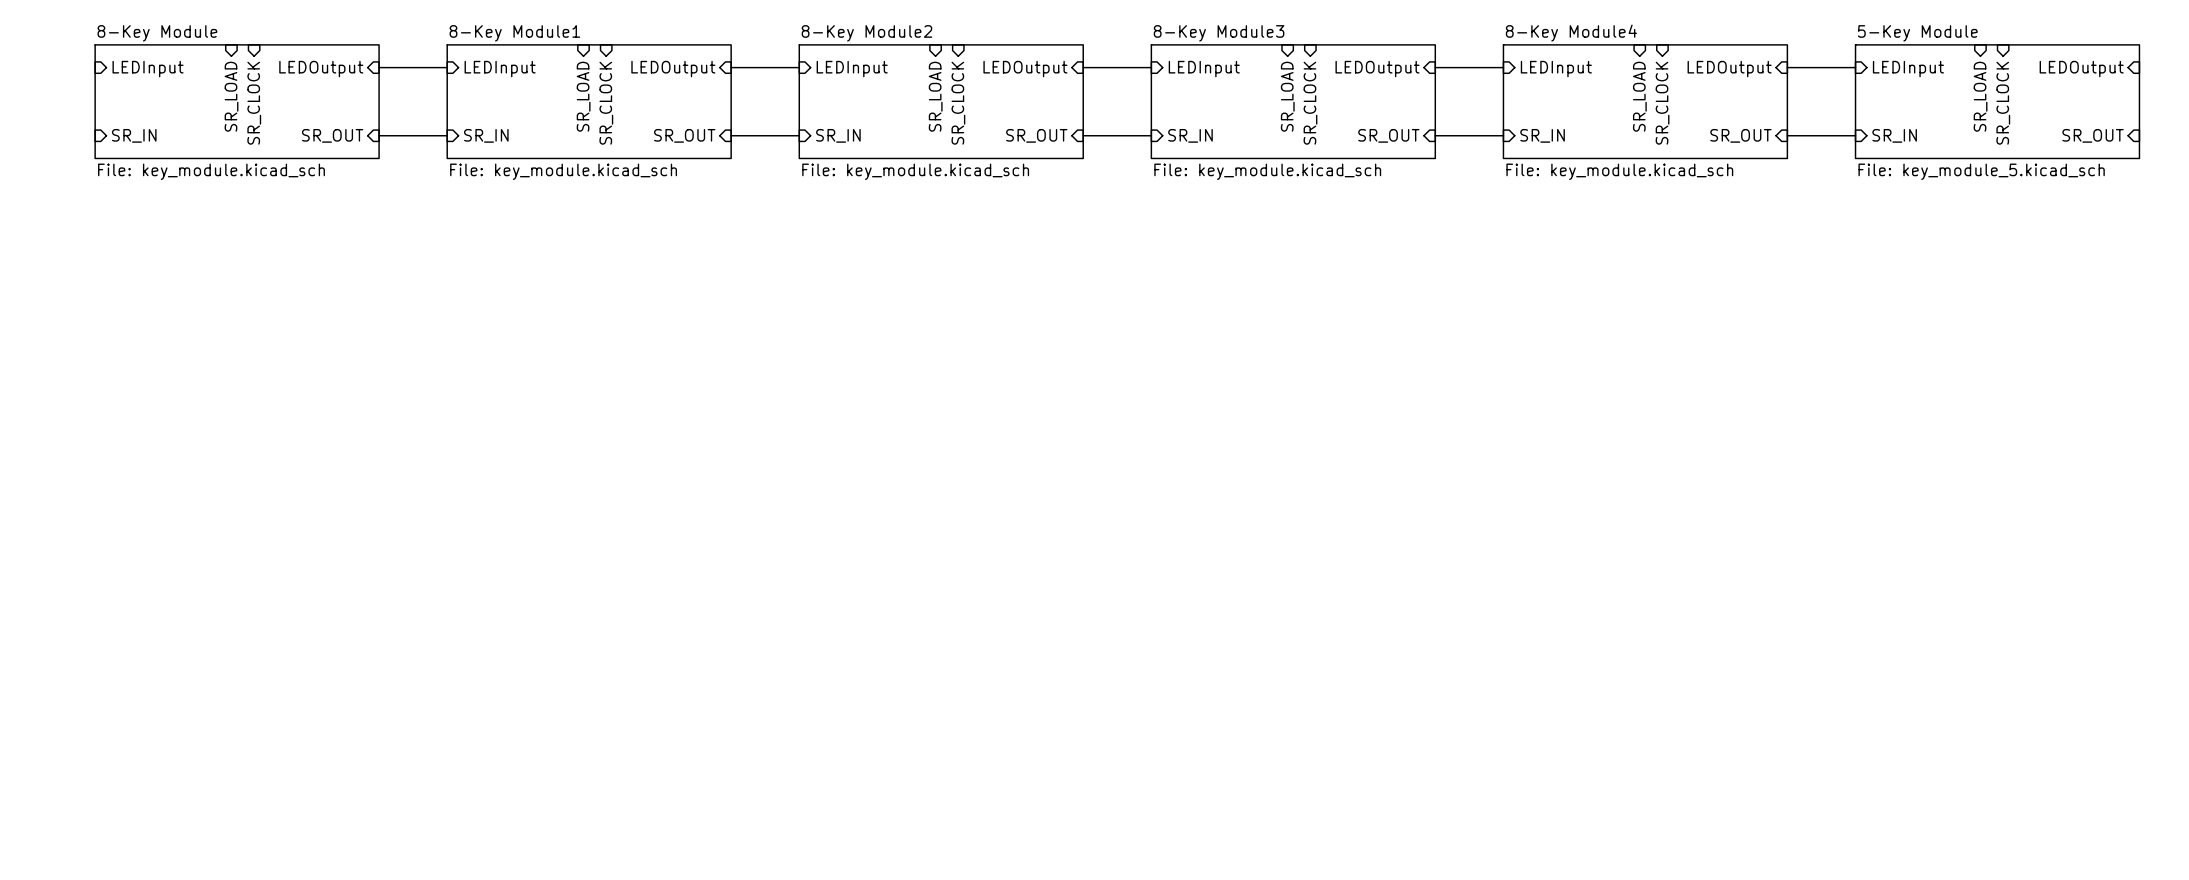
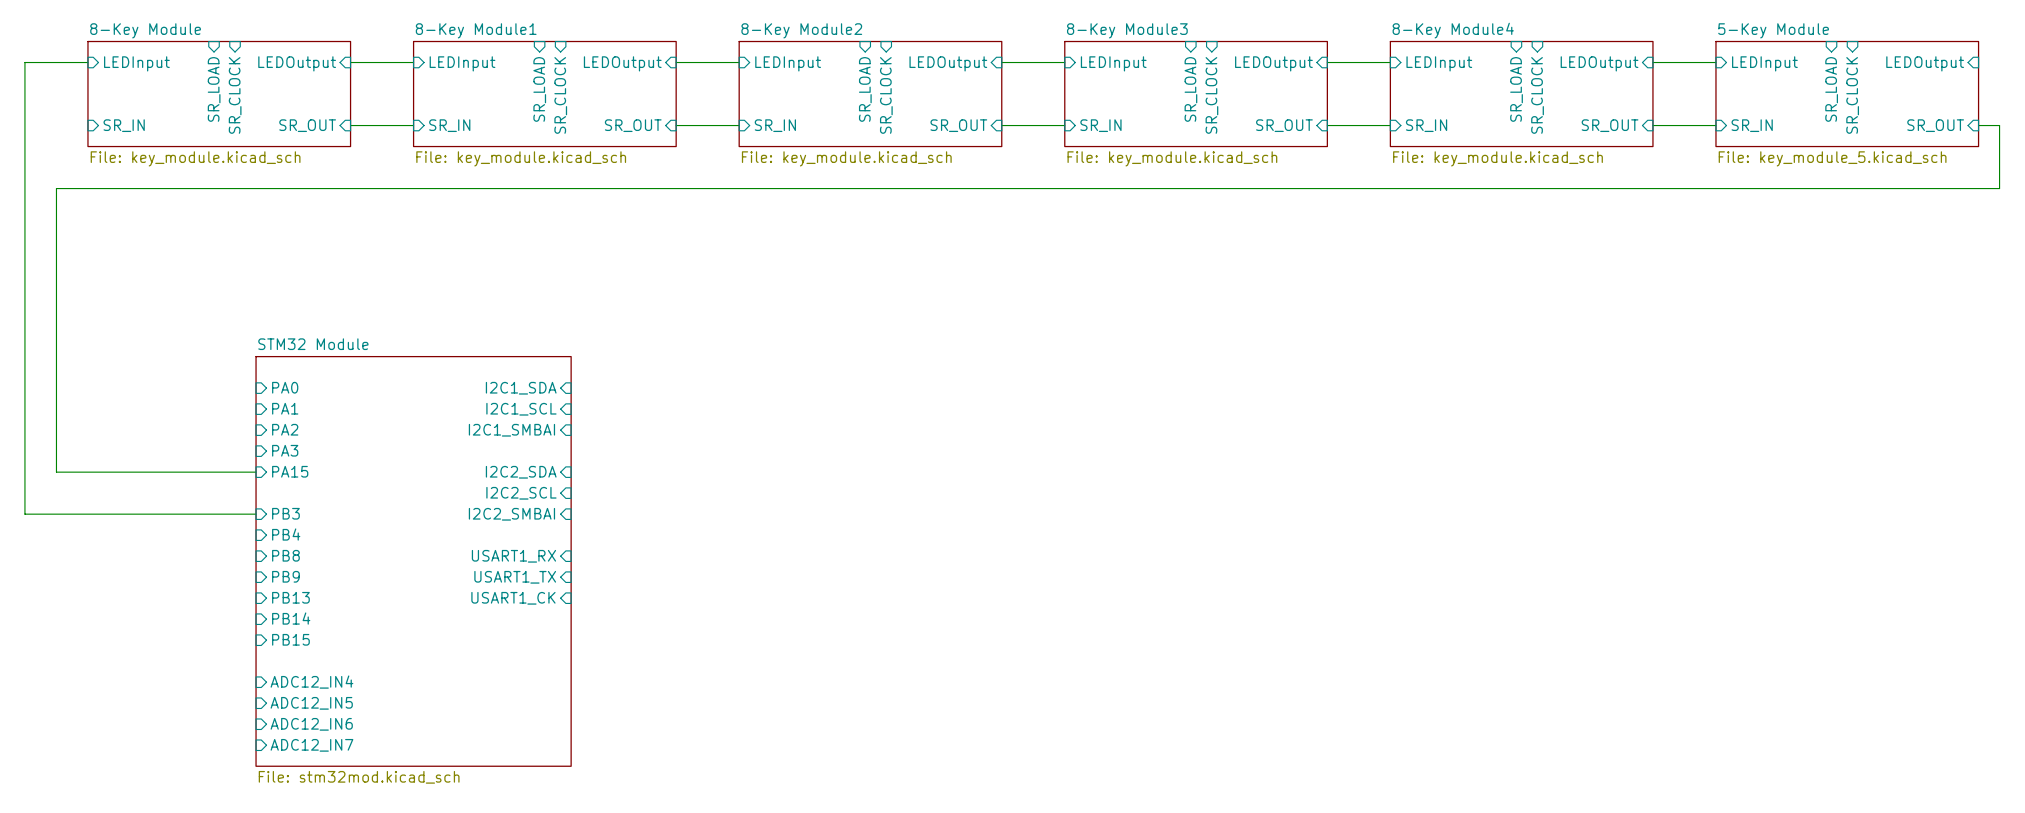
wire: none -> (87, 62) (24, 62) (24, 514) (256, 514)
wire: none -> (1978, 125) (1999, 125) (1999, 188) (56, 188) (56, 472) (256, 472)
sheet pin: none -> PA0 (285, 387)
sheet pin: none -> I2C1_SDA (521, 388)
sheet pin: none -> PA1 (285, 408)
sheet pin: none -> I2C1_SCL (521, 409)
sheet pin: none -> PA2 (285, 429)
sheet pin: none -> I2C1_SMBAI (511, 430)
sheet pin: none -> PA3 (285, 450)
sheet pin: none -> PA15 (290, 471)
sheet pin: none -> I2C2_SDA (521, 472)
sheet pin: none -> I2C2_SCL (521, 493)
sheet pin: none -> PB3 (285, 513)
sheet pin: none -> I2C2_SMBAI (511, 514)
sheet pin: none -> PB4 (286, 534)
sheet pin: none -> PB8 (285, 555)
sheet pin: none -> USART1_RX (513, 556)
sheet STM32 Module: none -> File: stm32mod.kicad_sch (413, 561)
sheet pin: none -> PB9 (285, 576)
sheet pin: none -> USART1_TX (515, 577)
sheet pin: none -> PB13 (290, 597)
sheet pin: none -> USART1_CK (513, 598)
sheet pin: none -> PB14 (291, 618)
sheet pin: none -> PB15 (290, 639)
sheet pin: none -> ADC12_IN4 (311, 682)
sheet pin: none -> ADC12_IN5 (311, 703)
sheet pin: none -> ADC12_IN6 (311, 724)
sheet pin: none -> ADC12_IN7 (311, 745)

